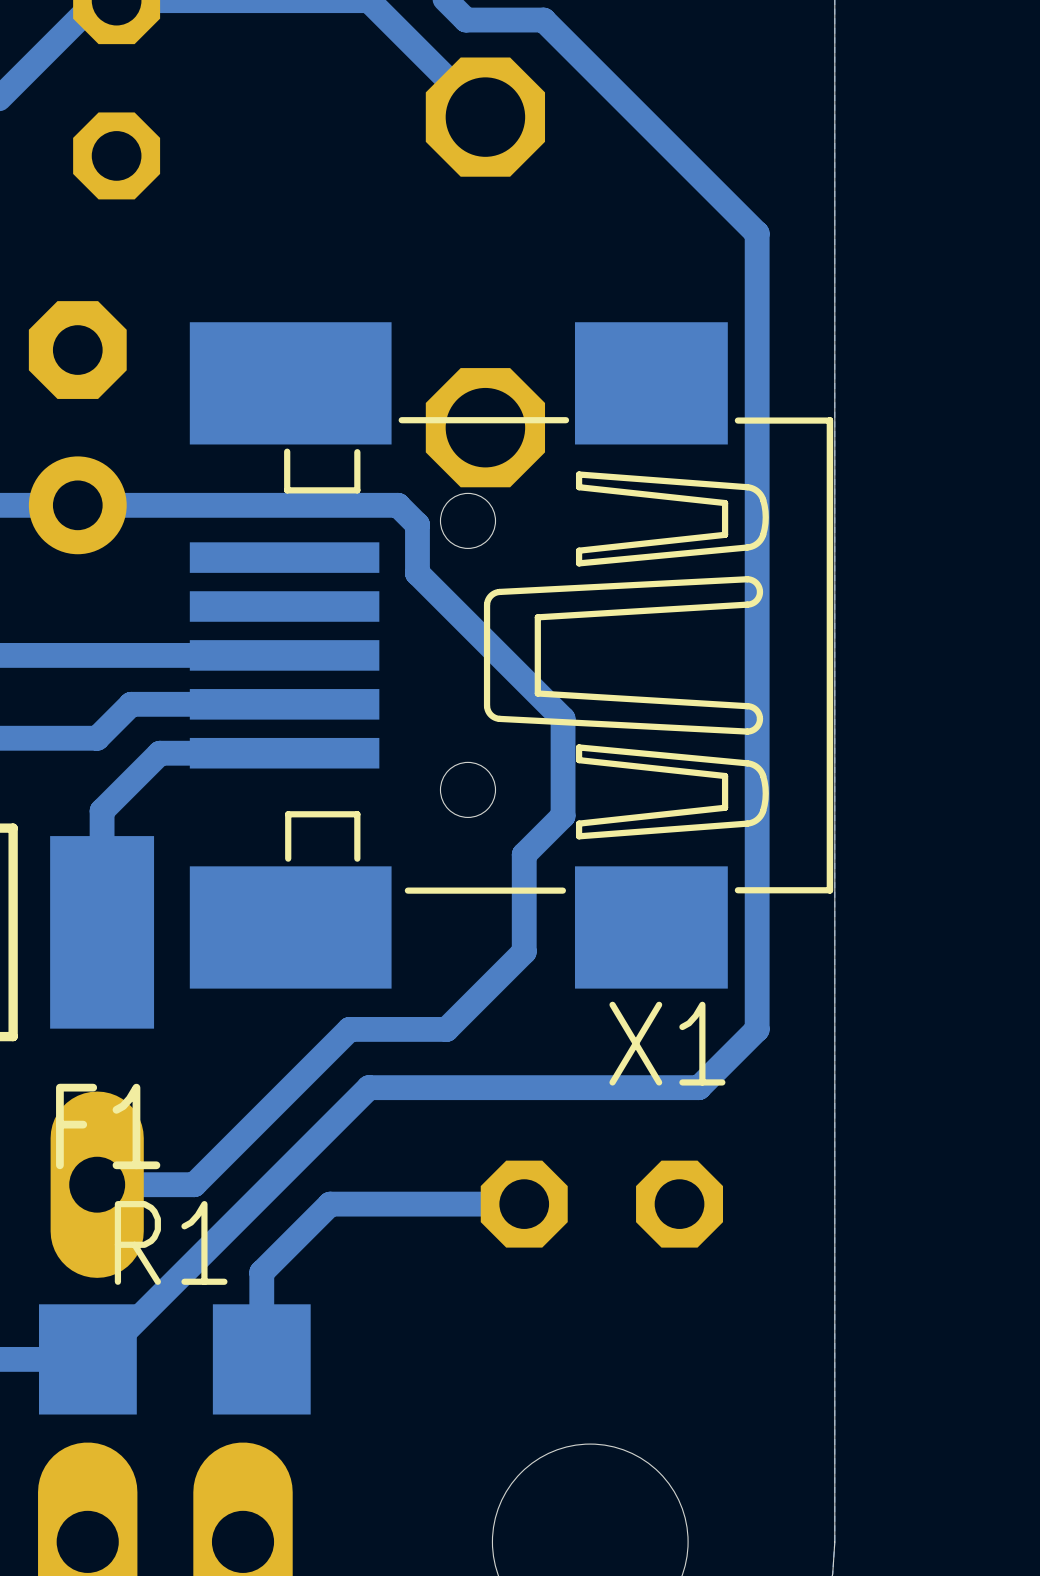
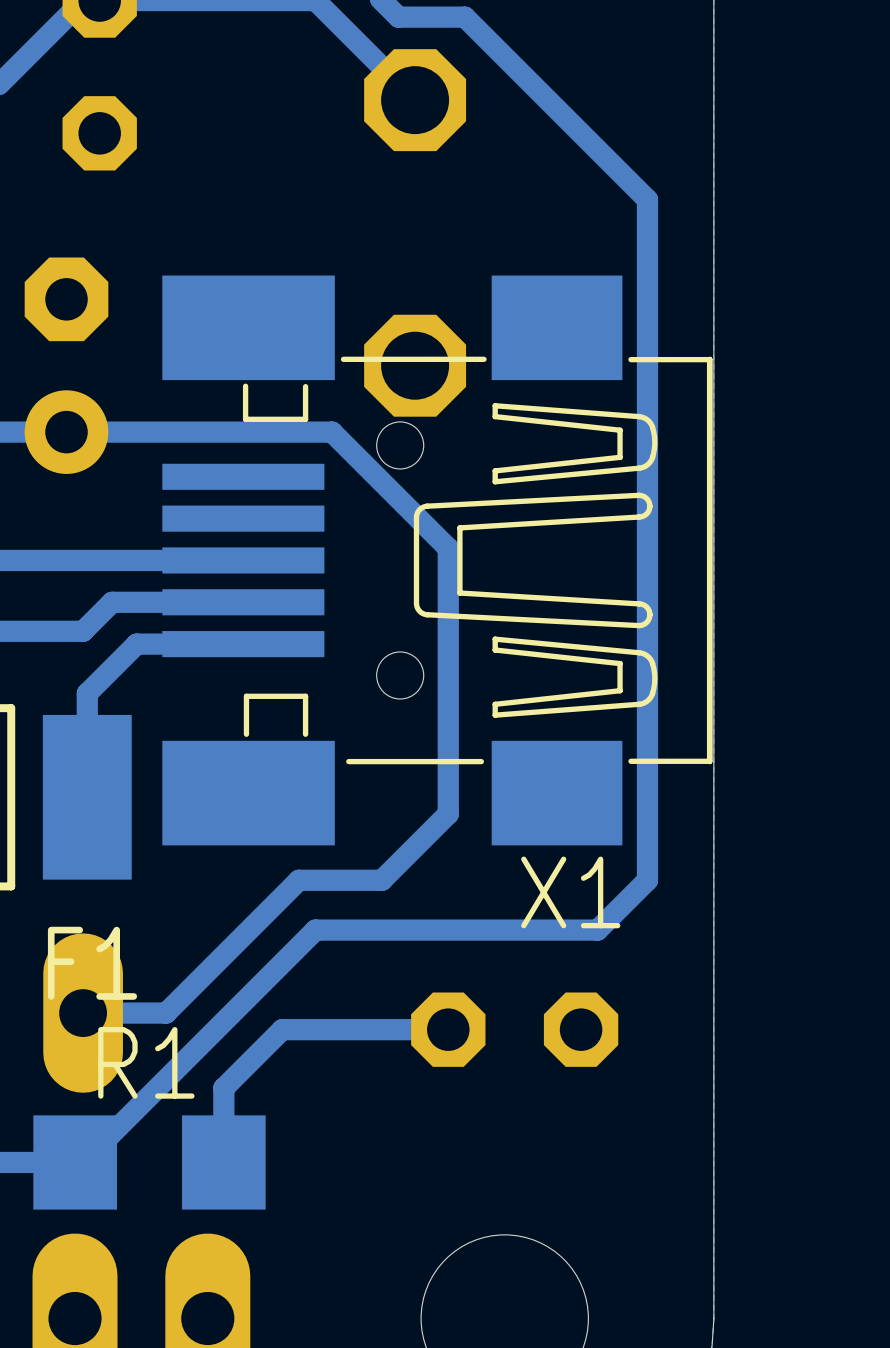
track: (388, 505) (398, 505) (417, 524) (417, 573) (563, 718) (563, 815) (524, 854) -> (332, 432) (448, 548) (448, 730)

